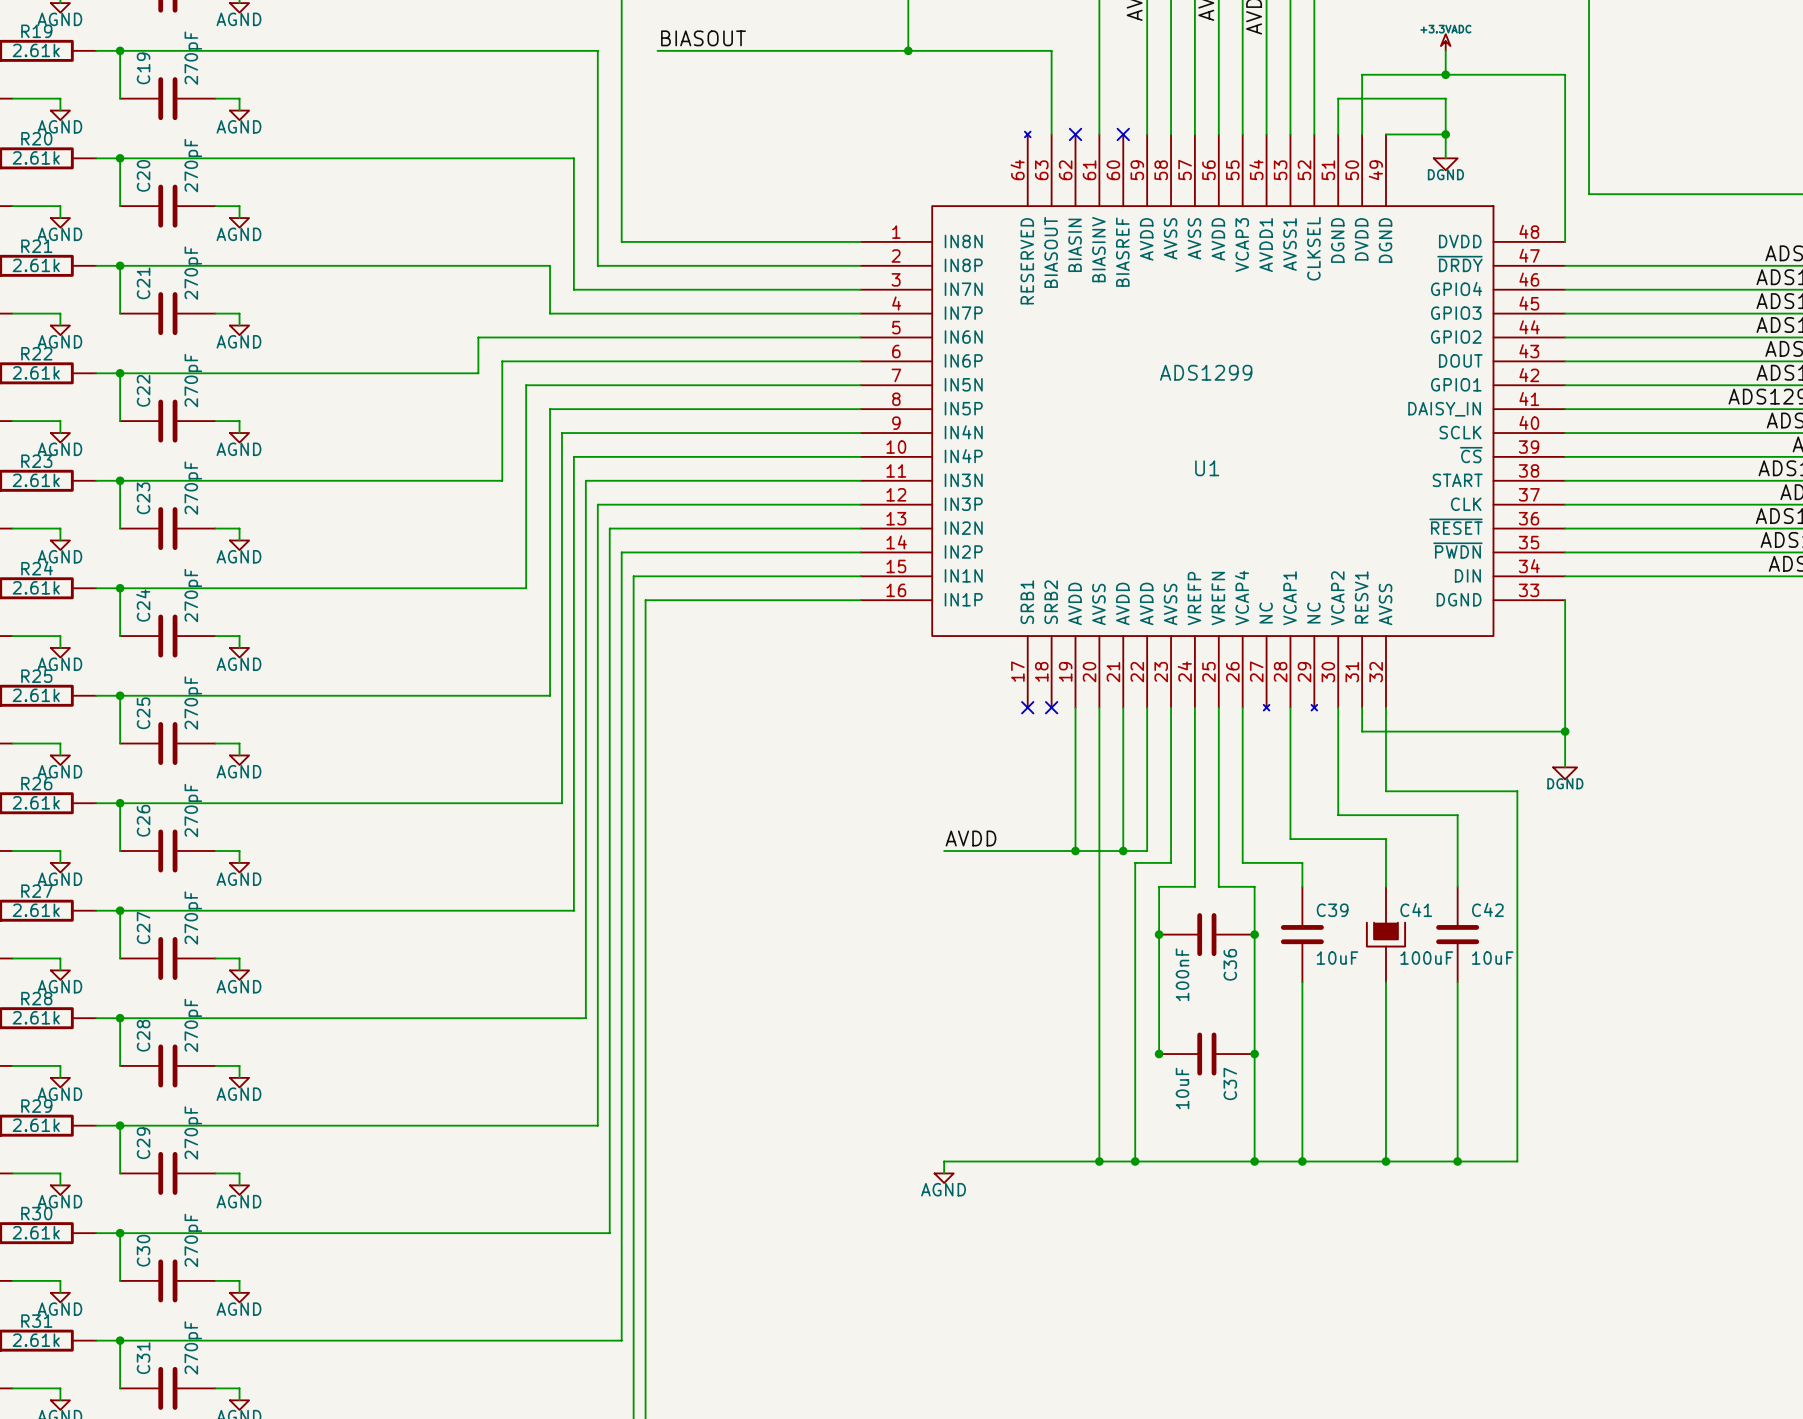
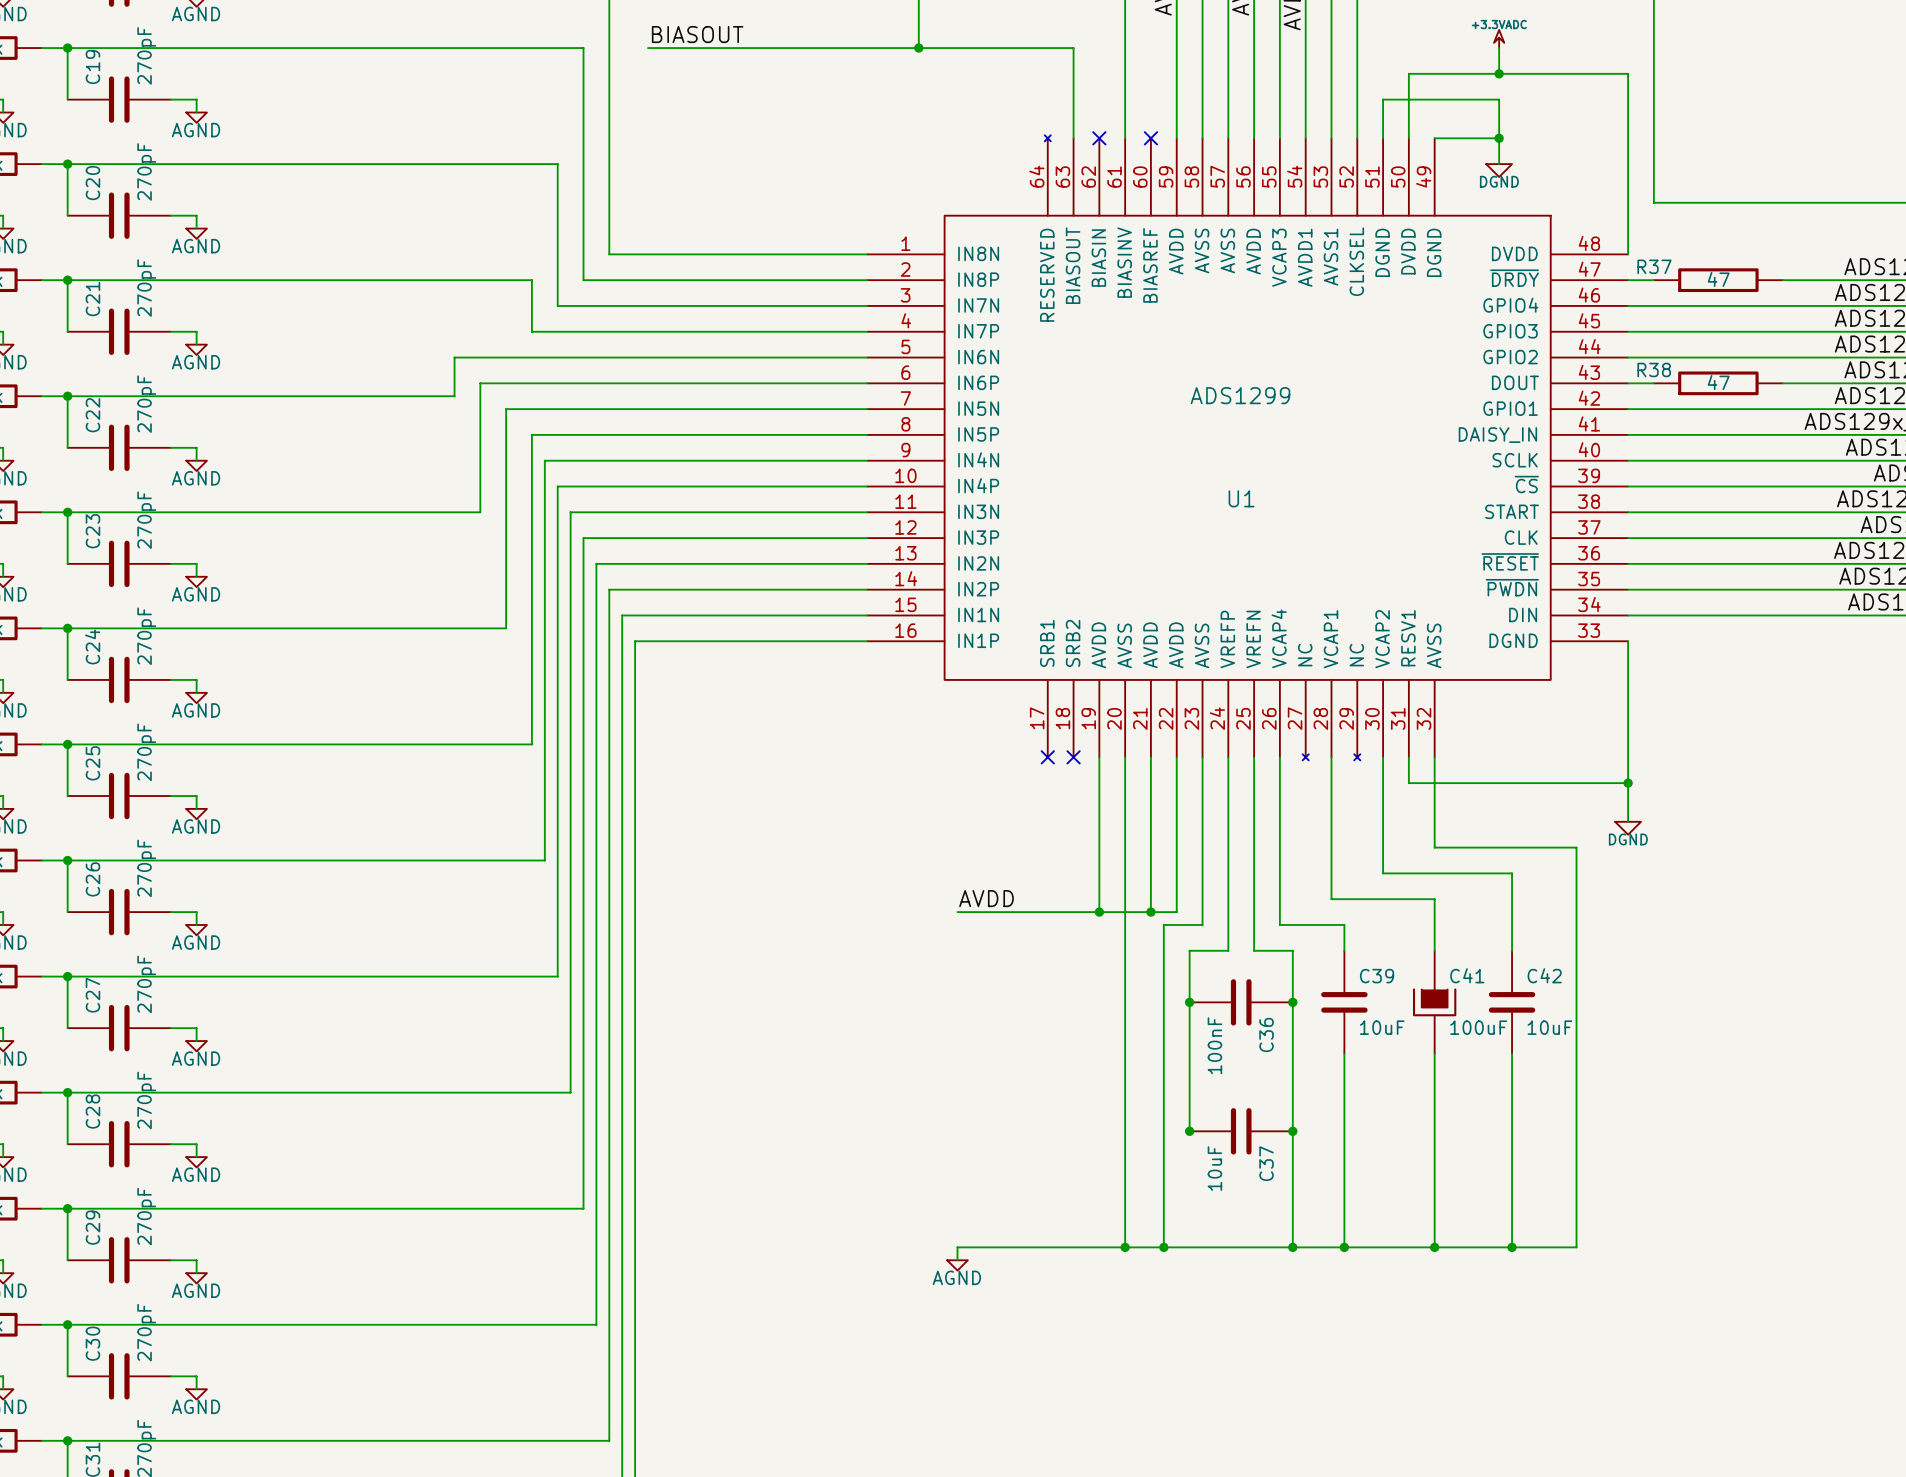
wire: (1589, 265) (1708, 265) -> none
R37: none -> 47 (1718, 280)
wire: (1589, 361) (1708, 361) -> none
R38: none -> 47 (1718, 383)

